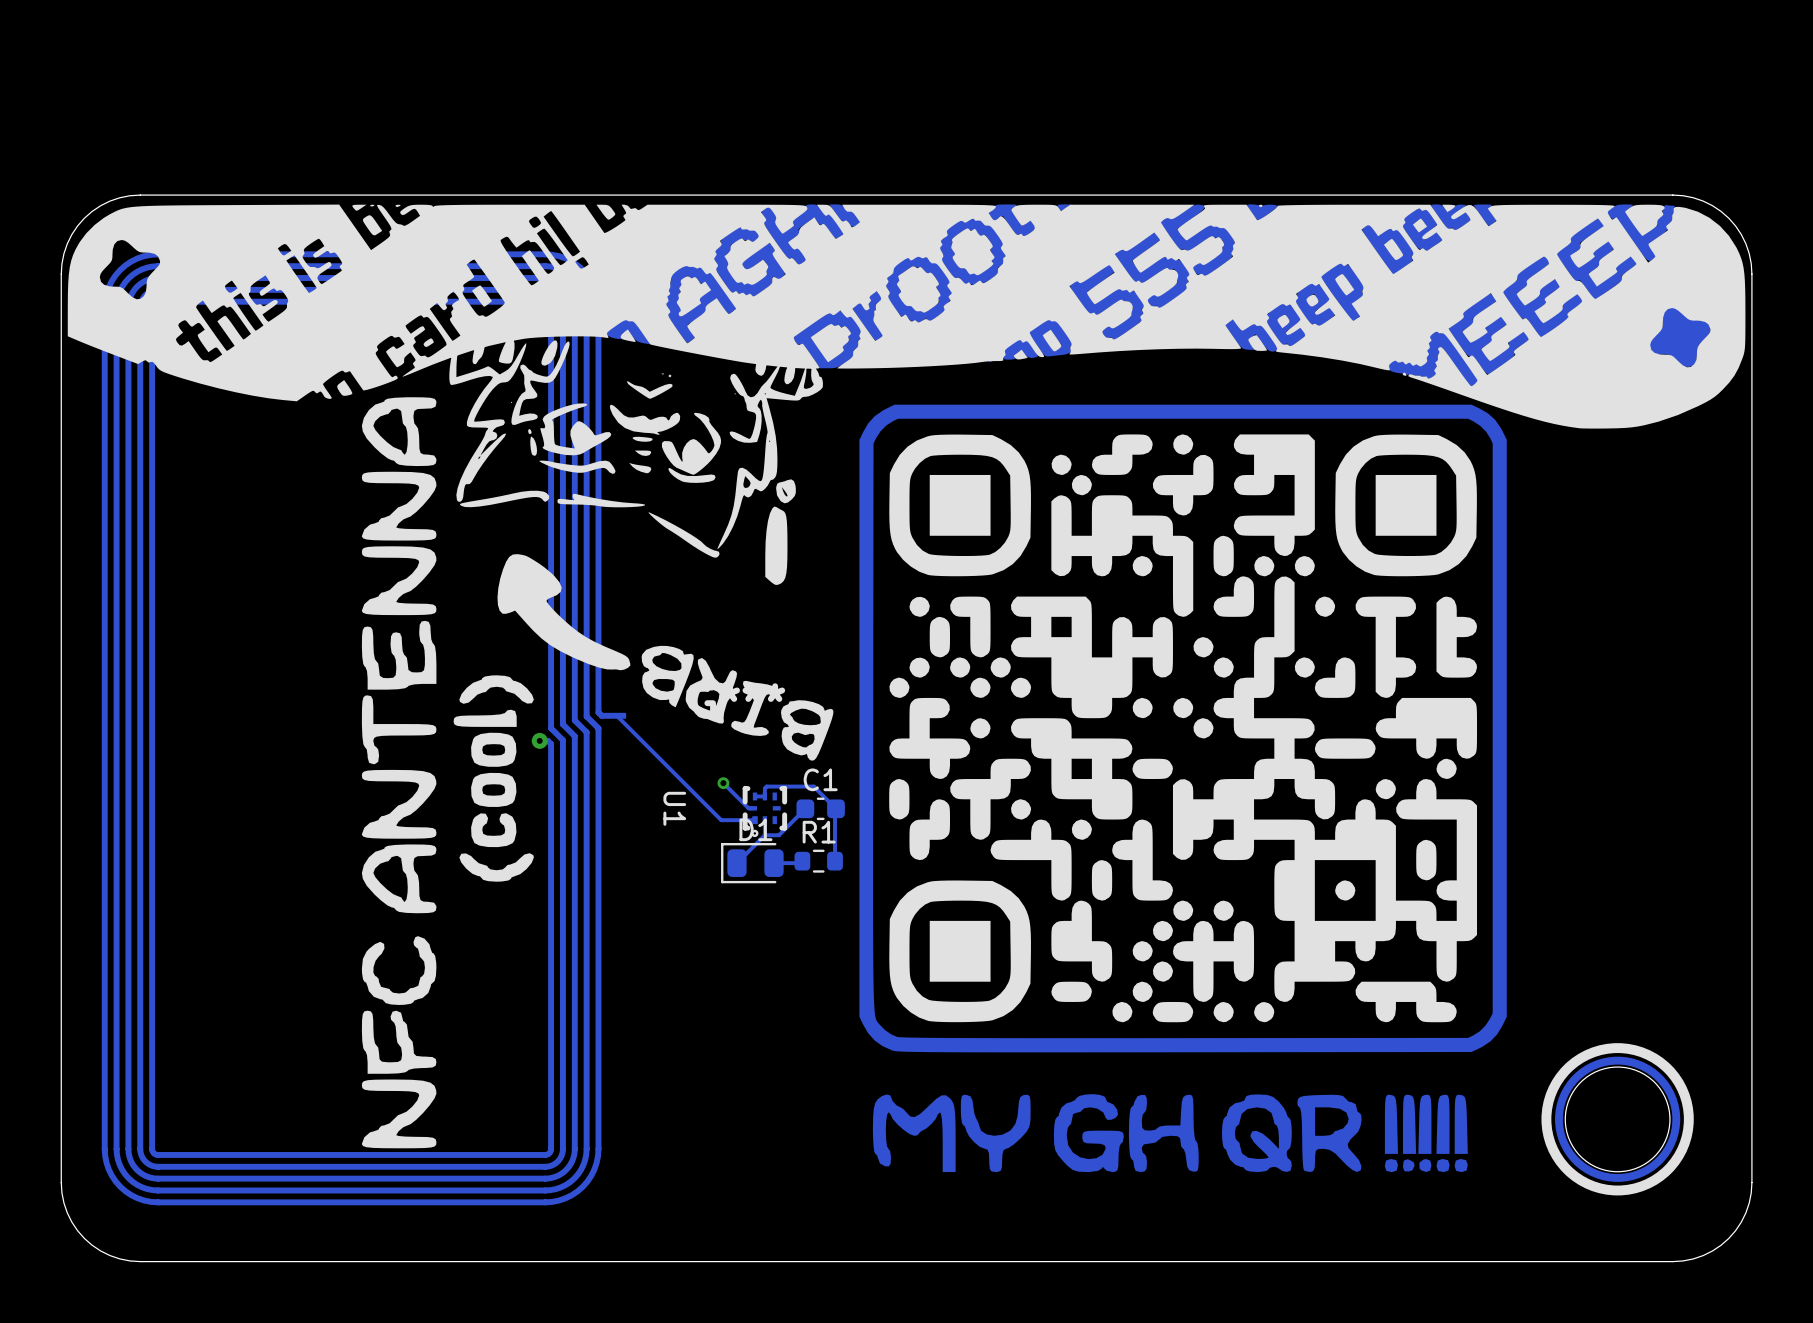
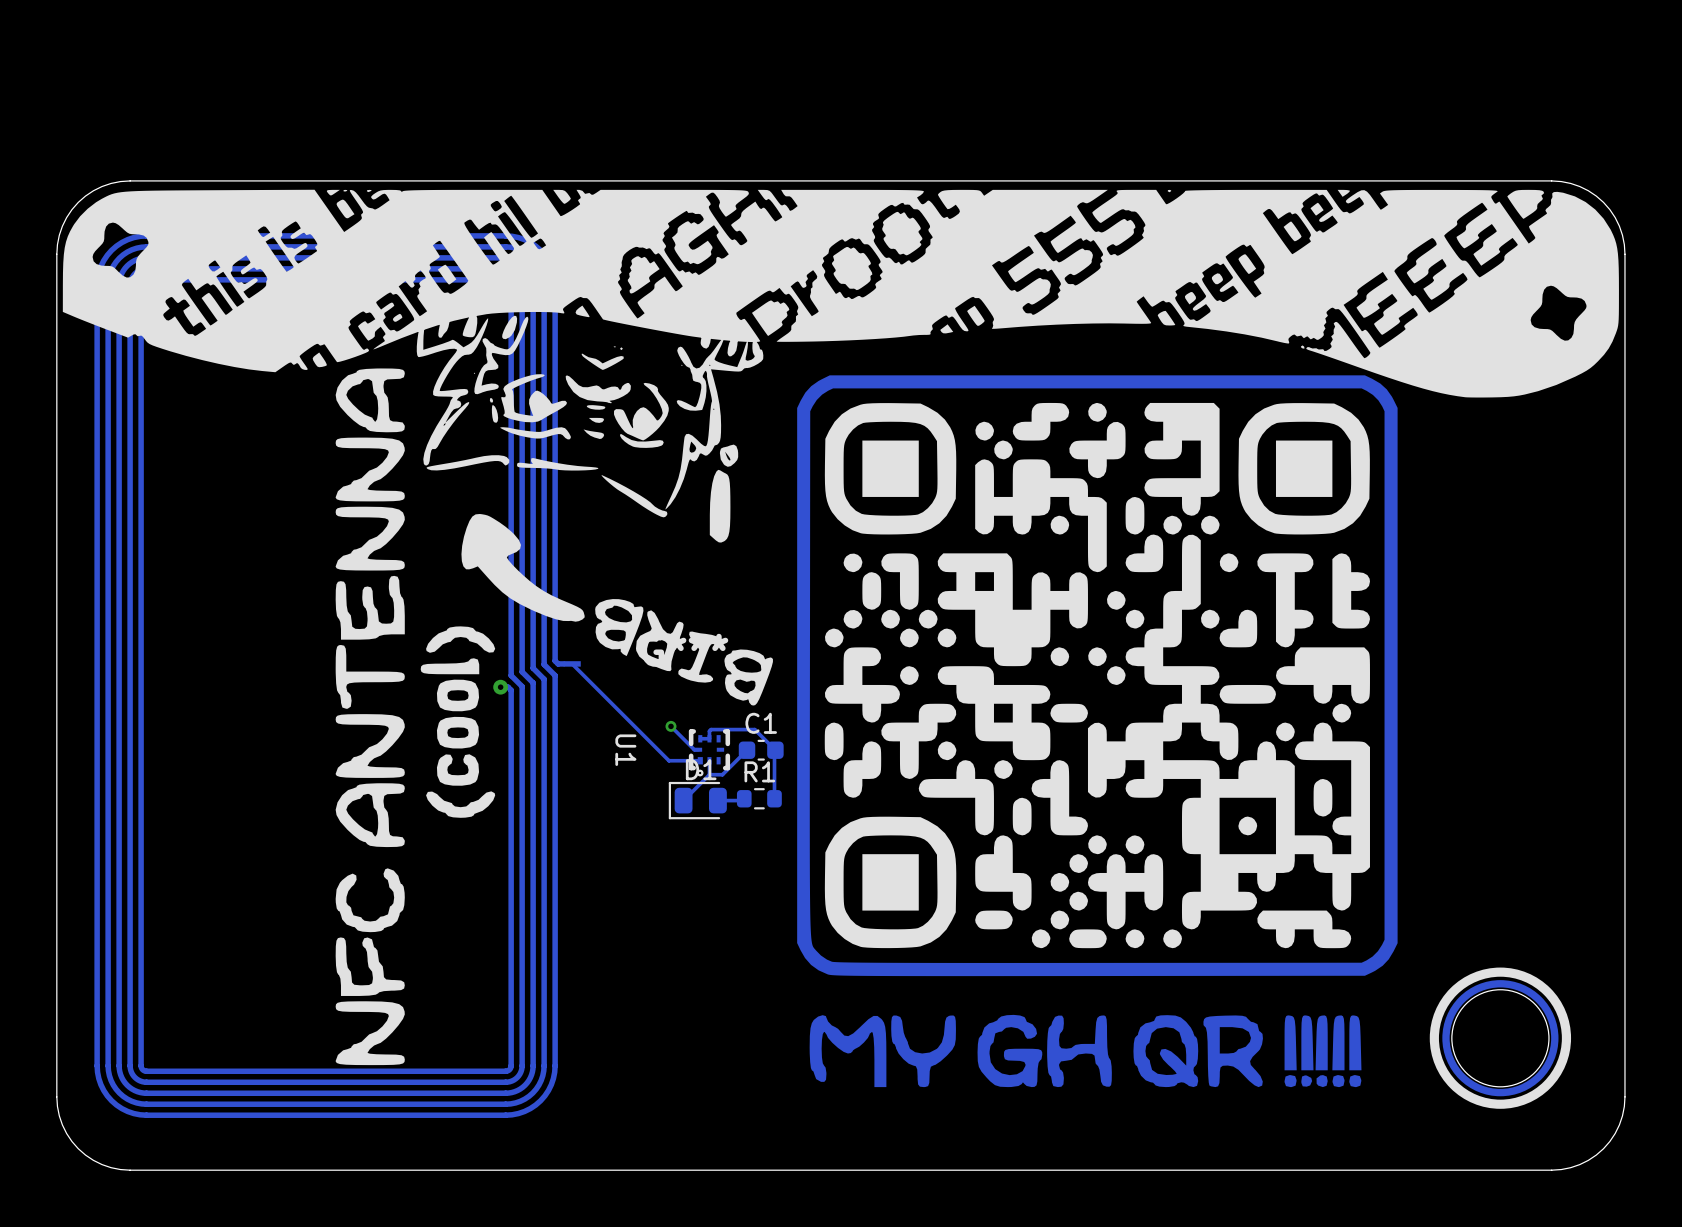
drawing: [606, 204, 1711, 388] -> none

